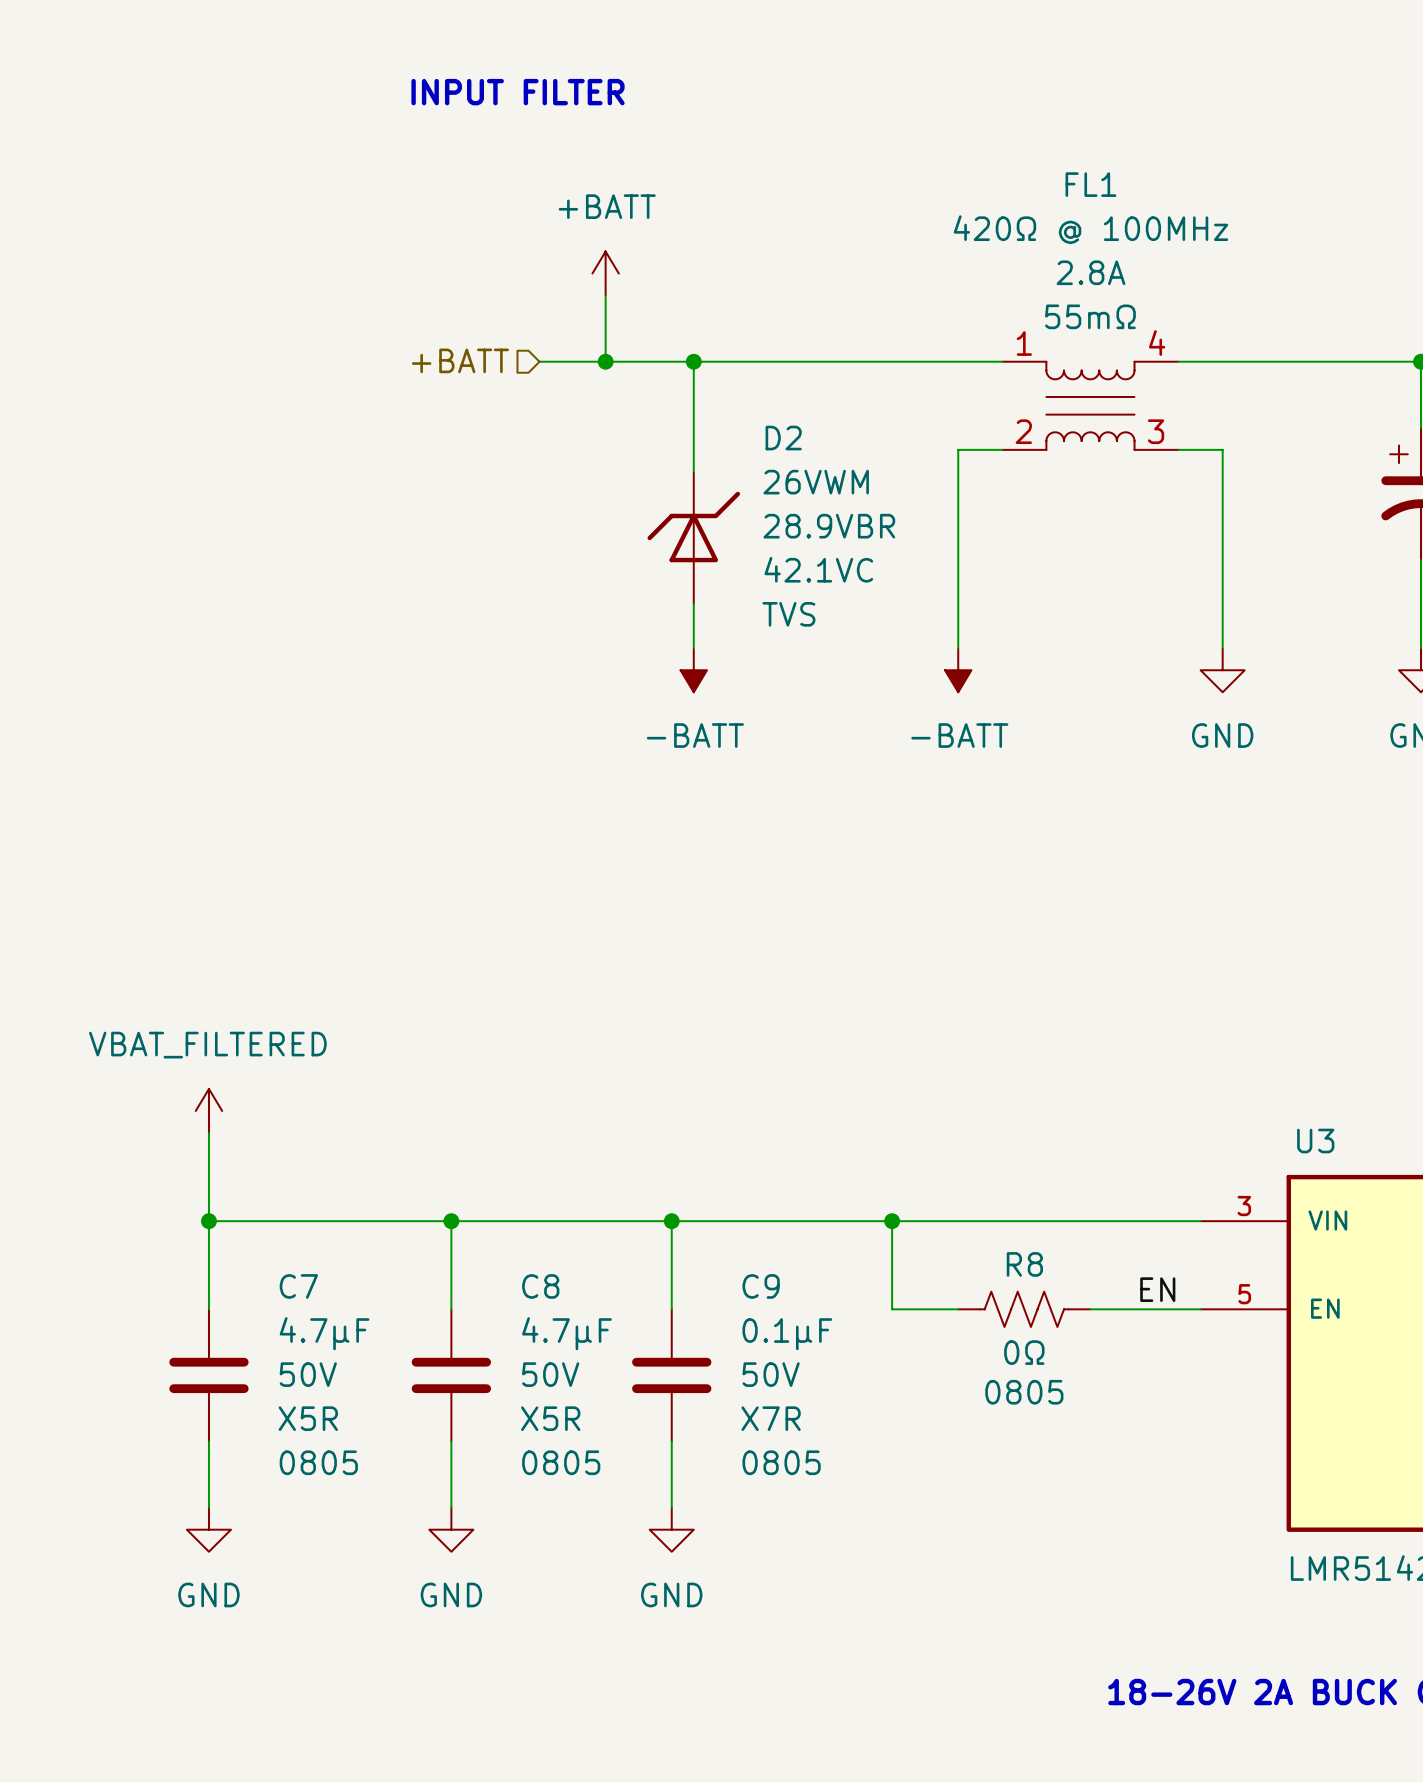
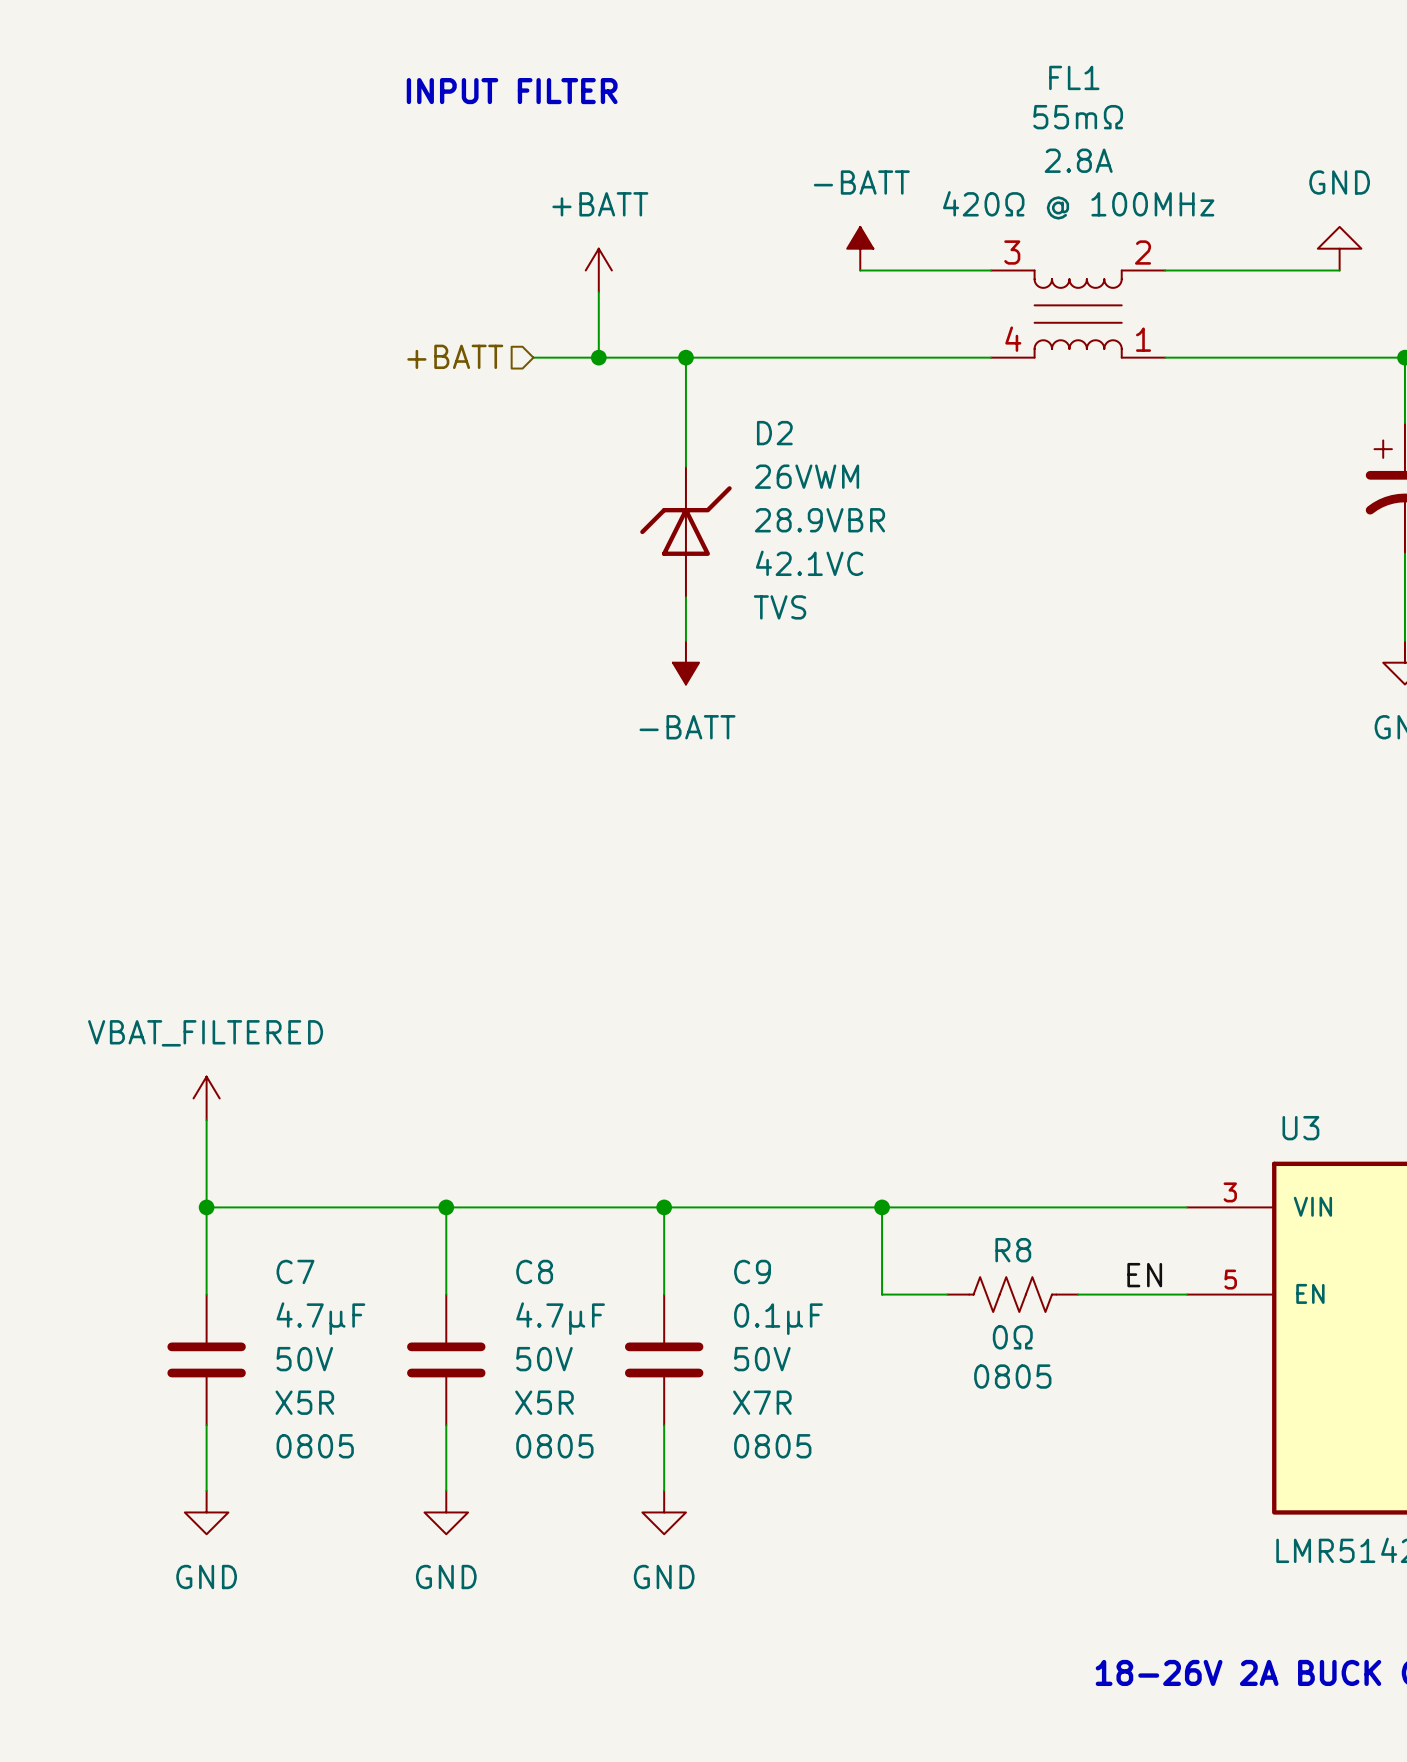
FL1 text position: 420Ω @ 100MHz (1090, 229) -> 420Ω @ 100MHz (1078, 205)
power symbol: none -> GND (1339, 248)
wire: none -> (860, 270) (991, 270)
wire: none -> (1165, 270) (1339, 270)
FL1 text position: 55mΩ (1090, 316) -> 55mΩ (1078, 117)
FL1 rotation: 0° (1090, 405) -> 180° (1078, 314)
wire: (1002, 449) (958, 449) (958, 648) -> none
wire: (1178, 449) (1222, 449) (1222, 648) -> none
power symbol rotation: 0° (958, 670) -> 180° (860, 248)
power symbol position: -BATT (958, 670) -> -BATT (860, 248)
power symbol: GND (1222, 670) -> none

